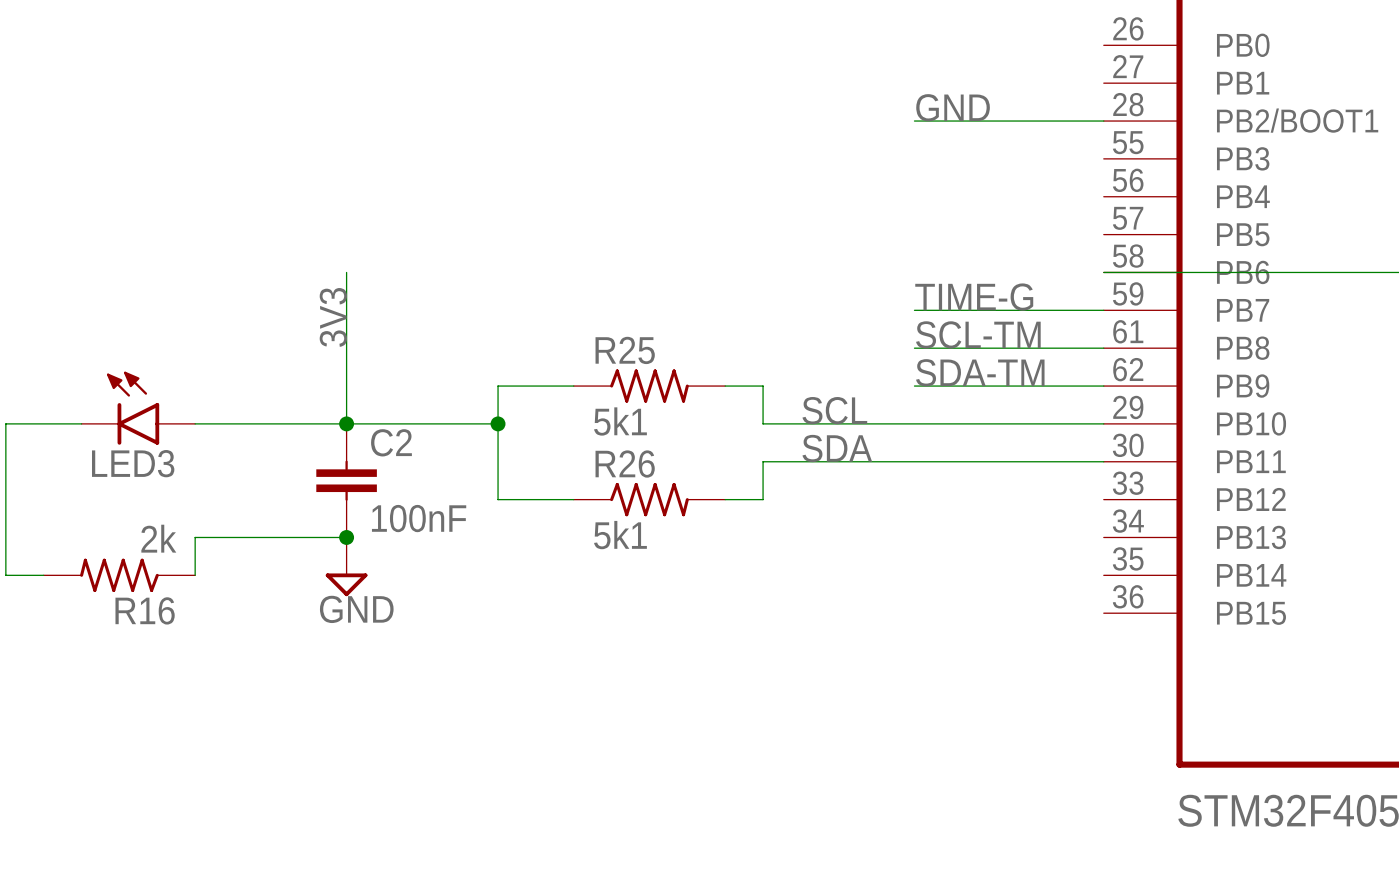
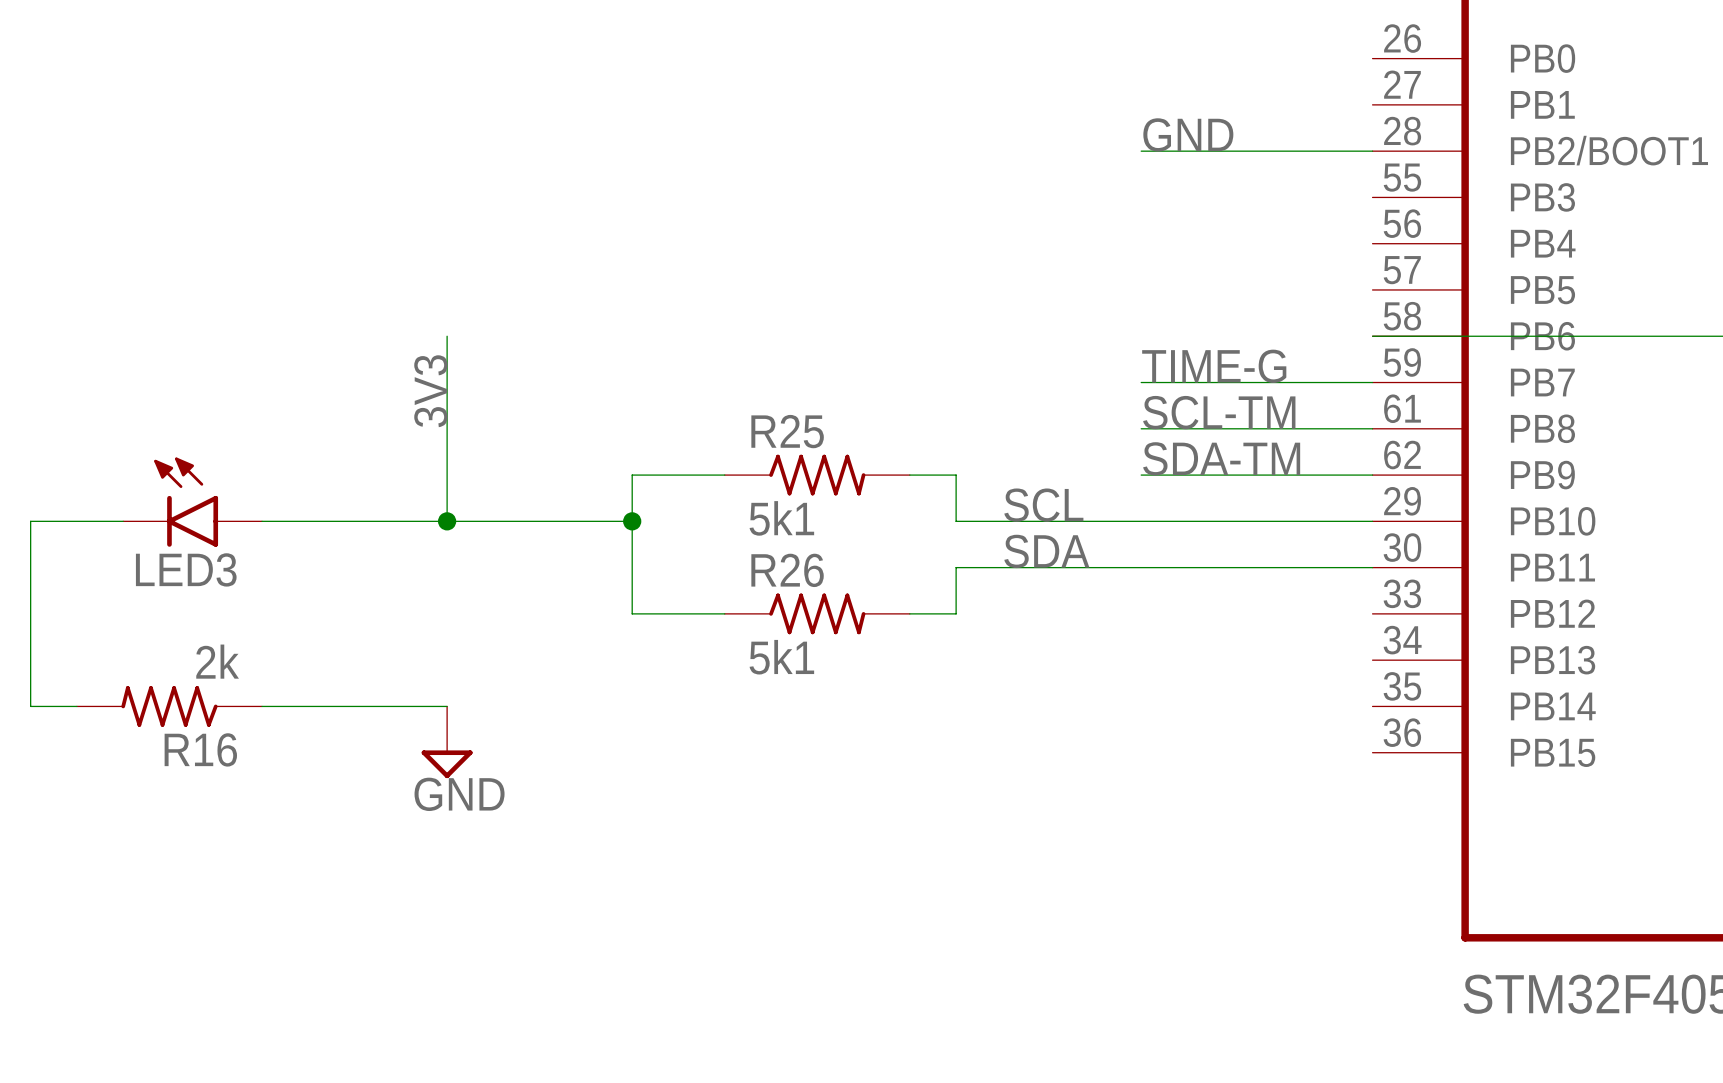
C2: 100nF (346, 480) -> none
wire: (346, 537) (195, 537) (195, 575) -> (447, 706) (262, 706)
junction: (346, 537) -> none
power symbol position: GND (346, 566) -> GND (447, 742)

